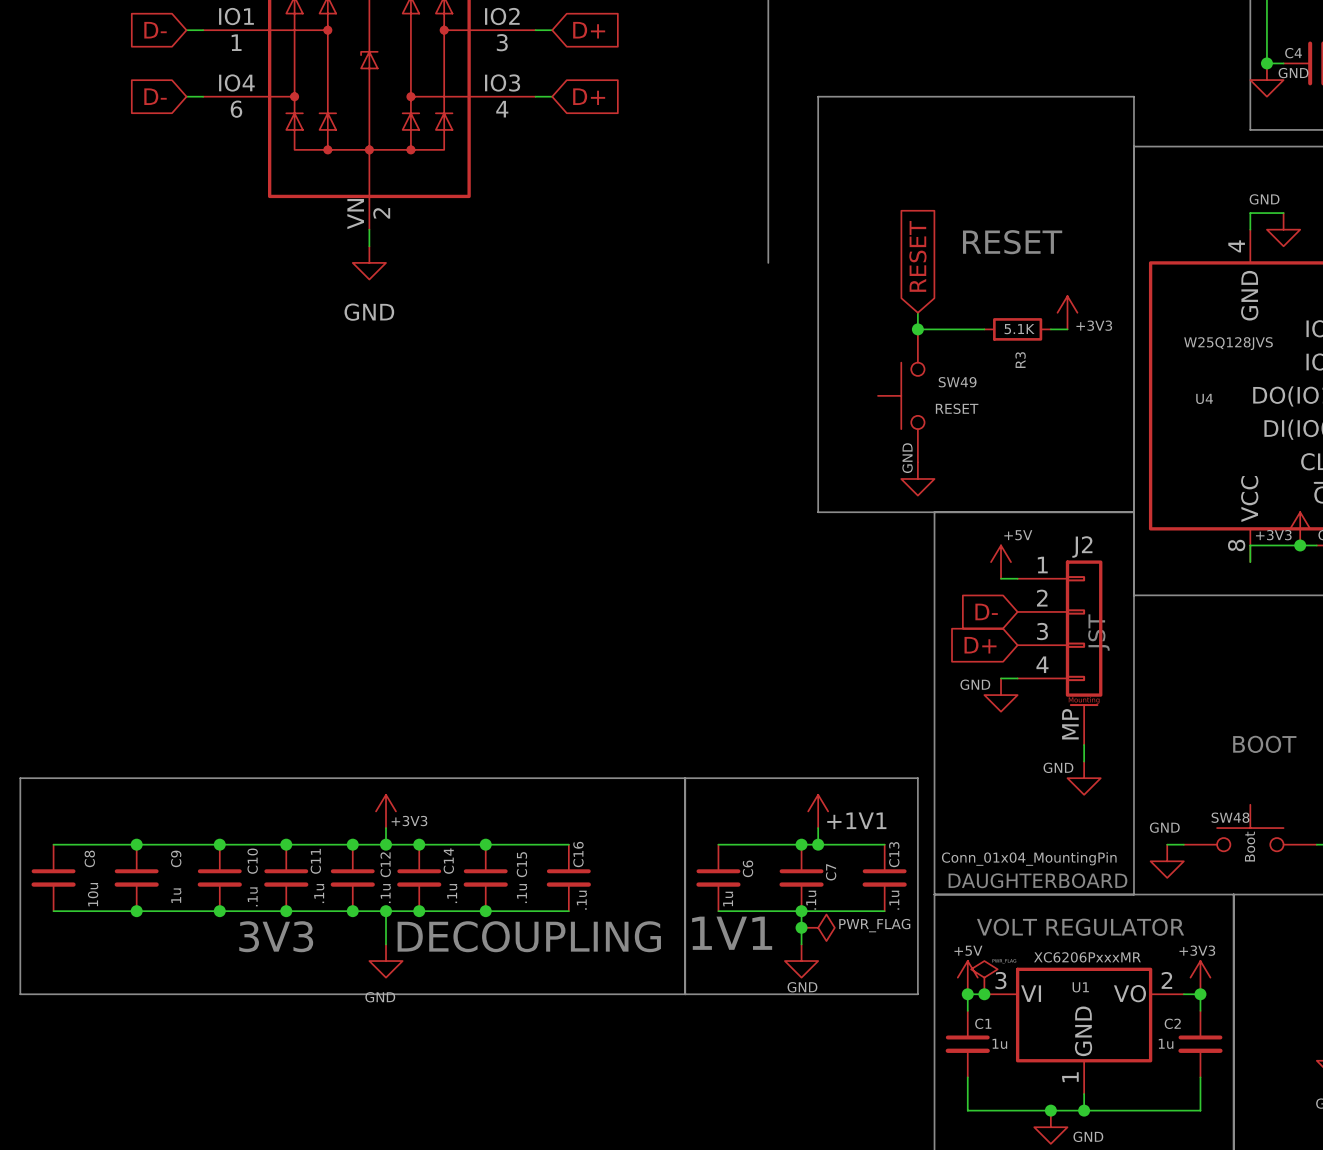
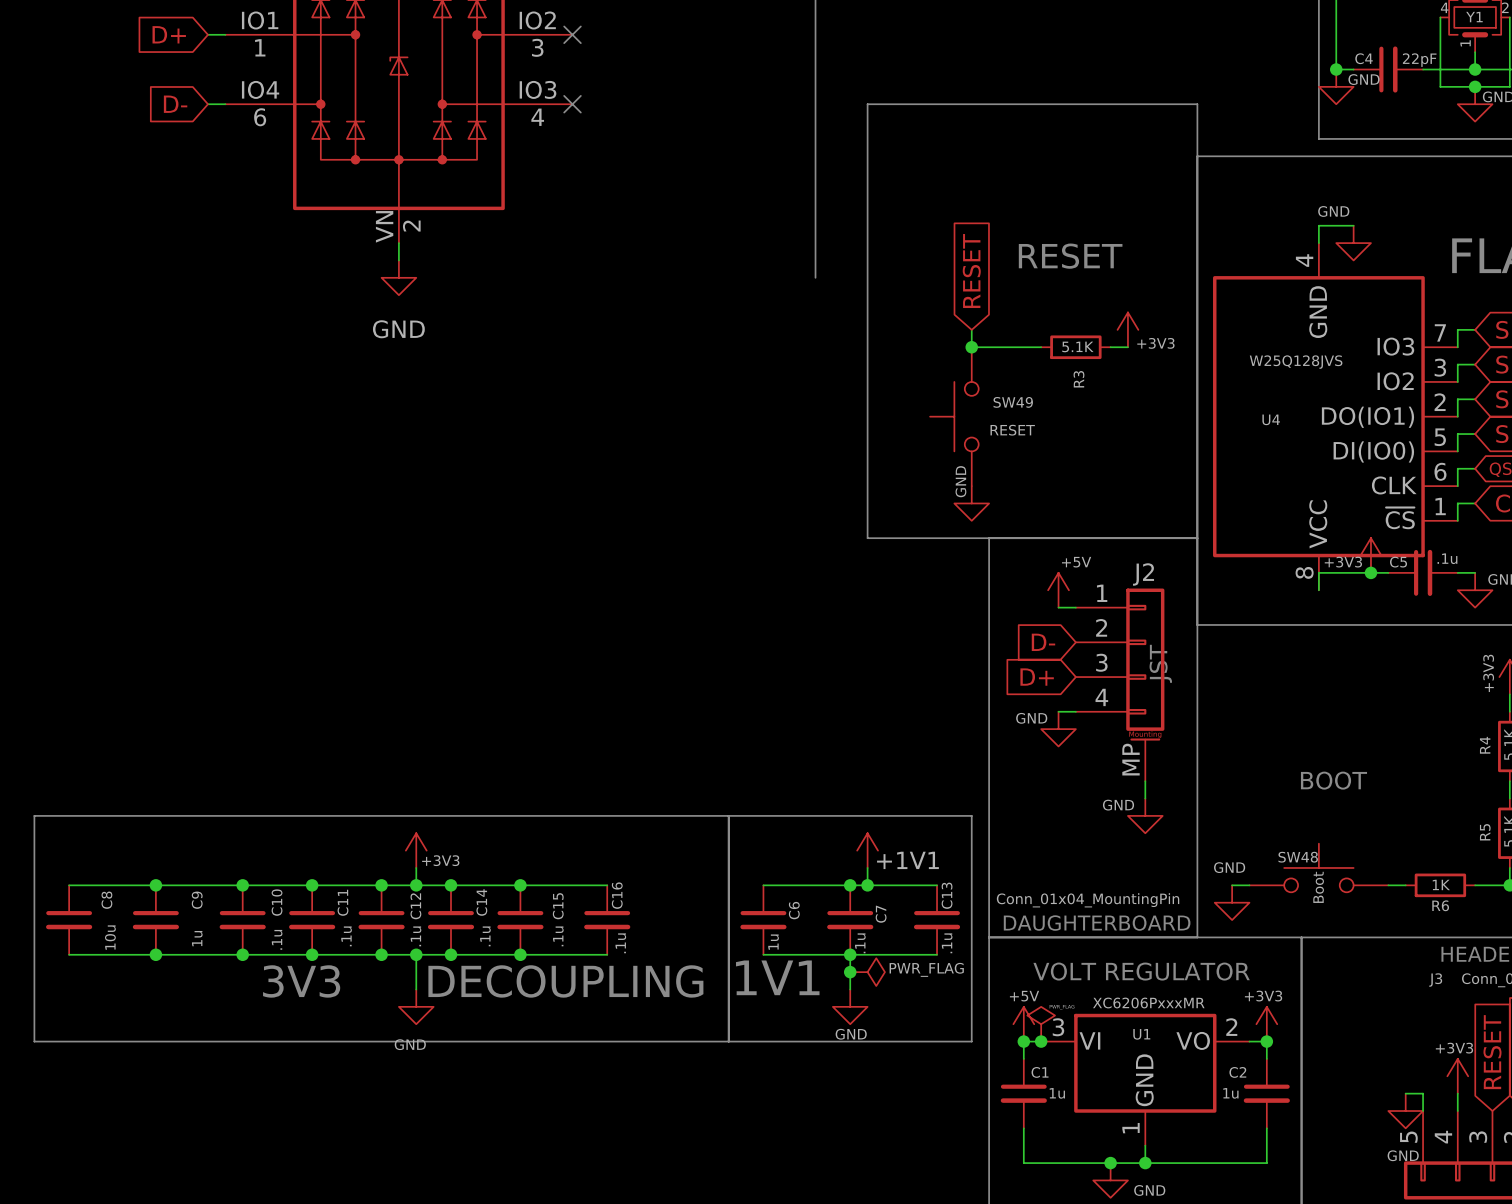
global label: D- (155, 30) -> D+ (169, 34)
wire: (535, 30) (552, 30) -> none
no-connect mark: none -> (572, 34)
global label: D+ (589, 30) -> none
wire: (535, 96) (552, 96) -> none
no-connect mark: none -> (572, 104)
global label: D+ (589, 96) -> none

